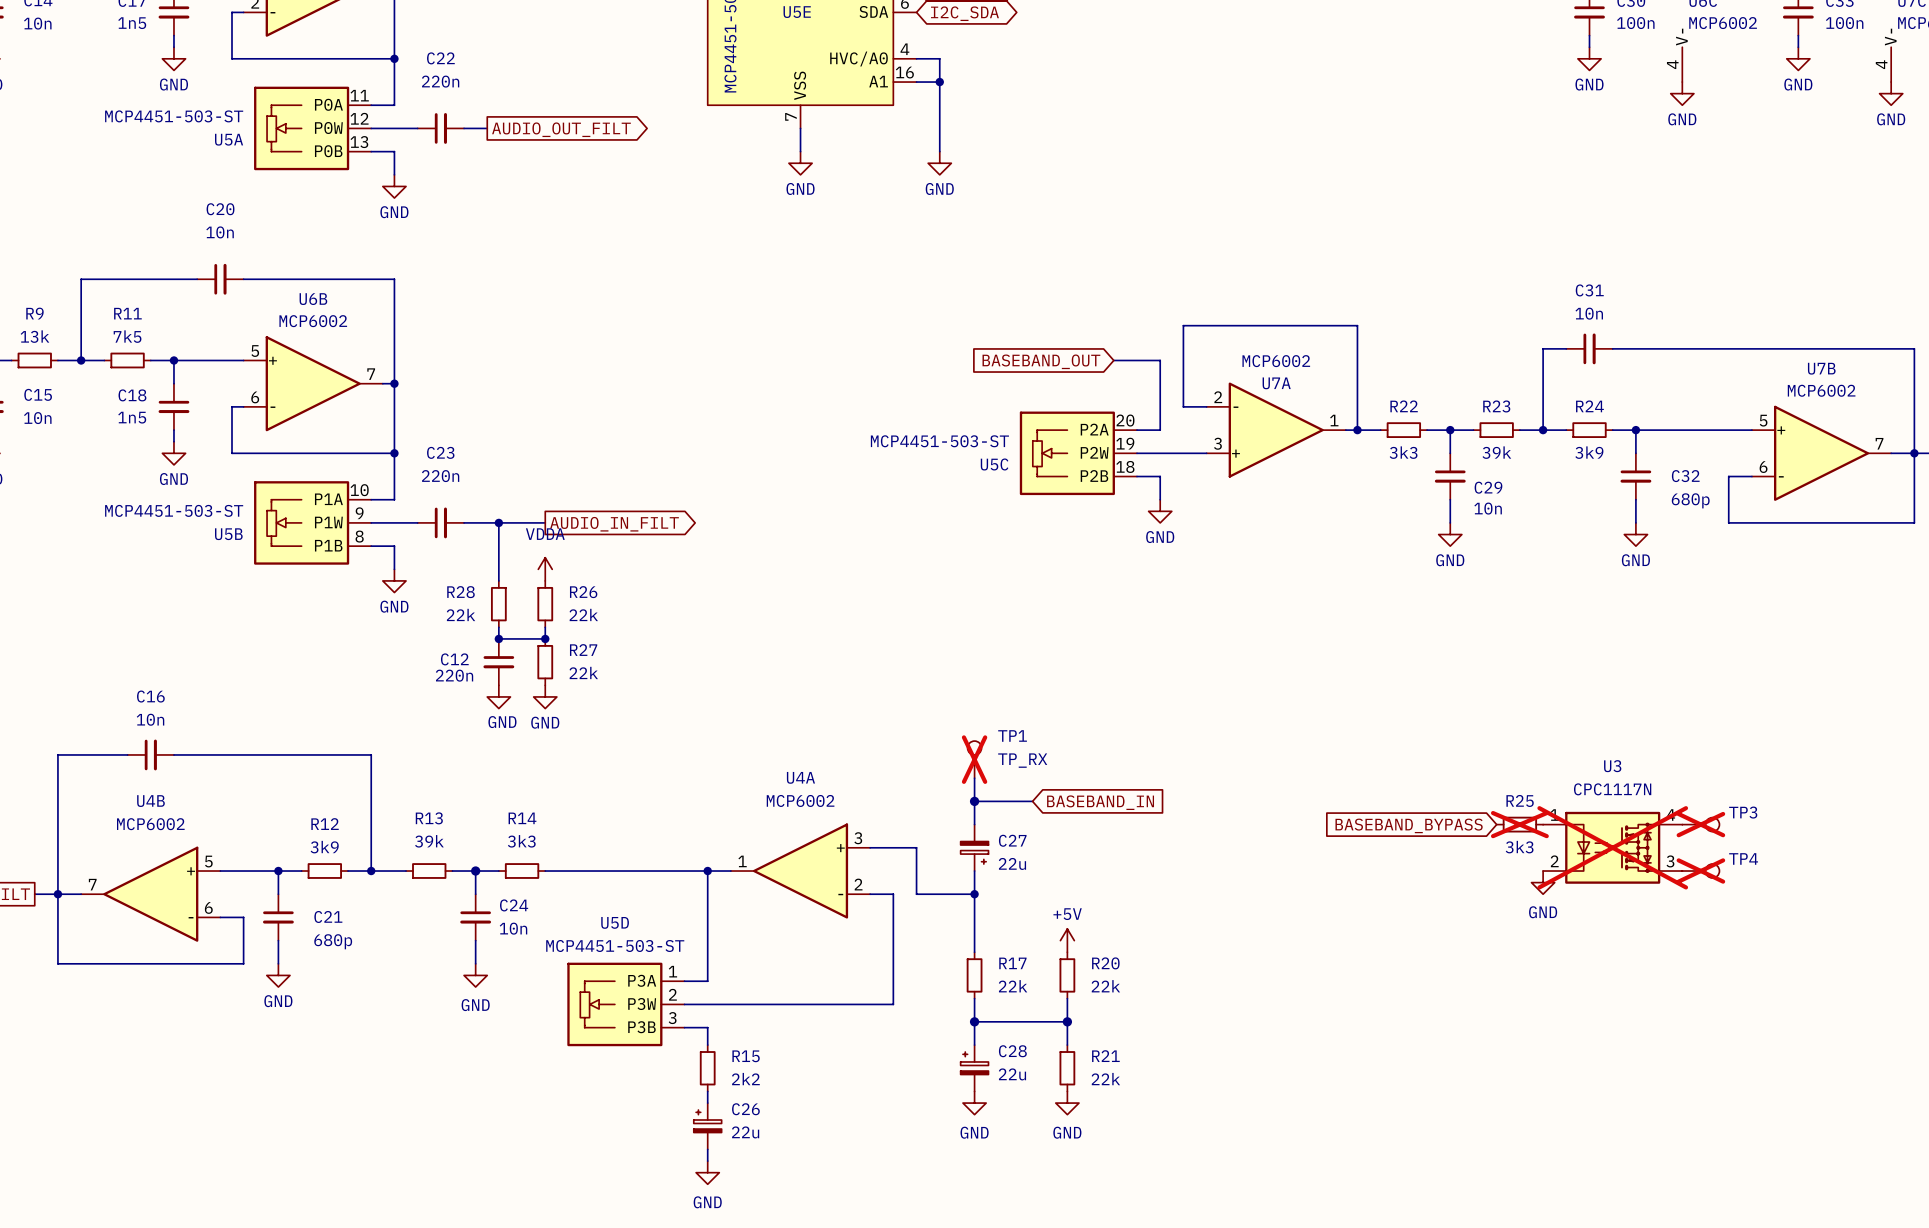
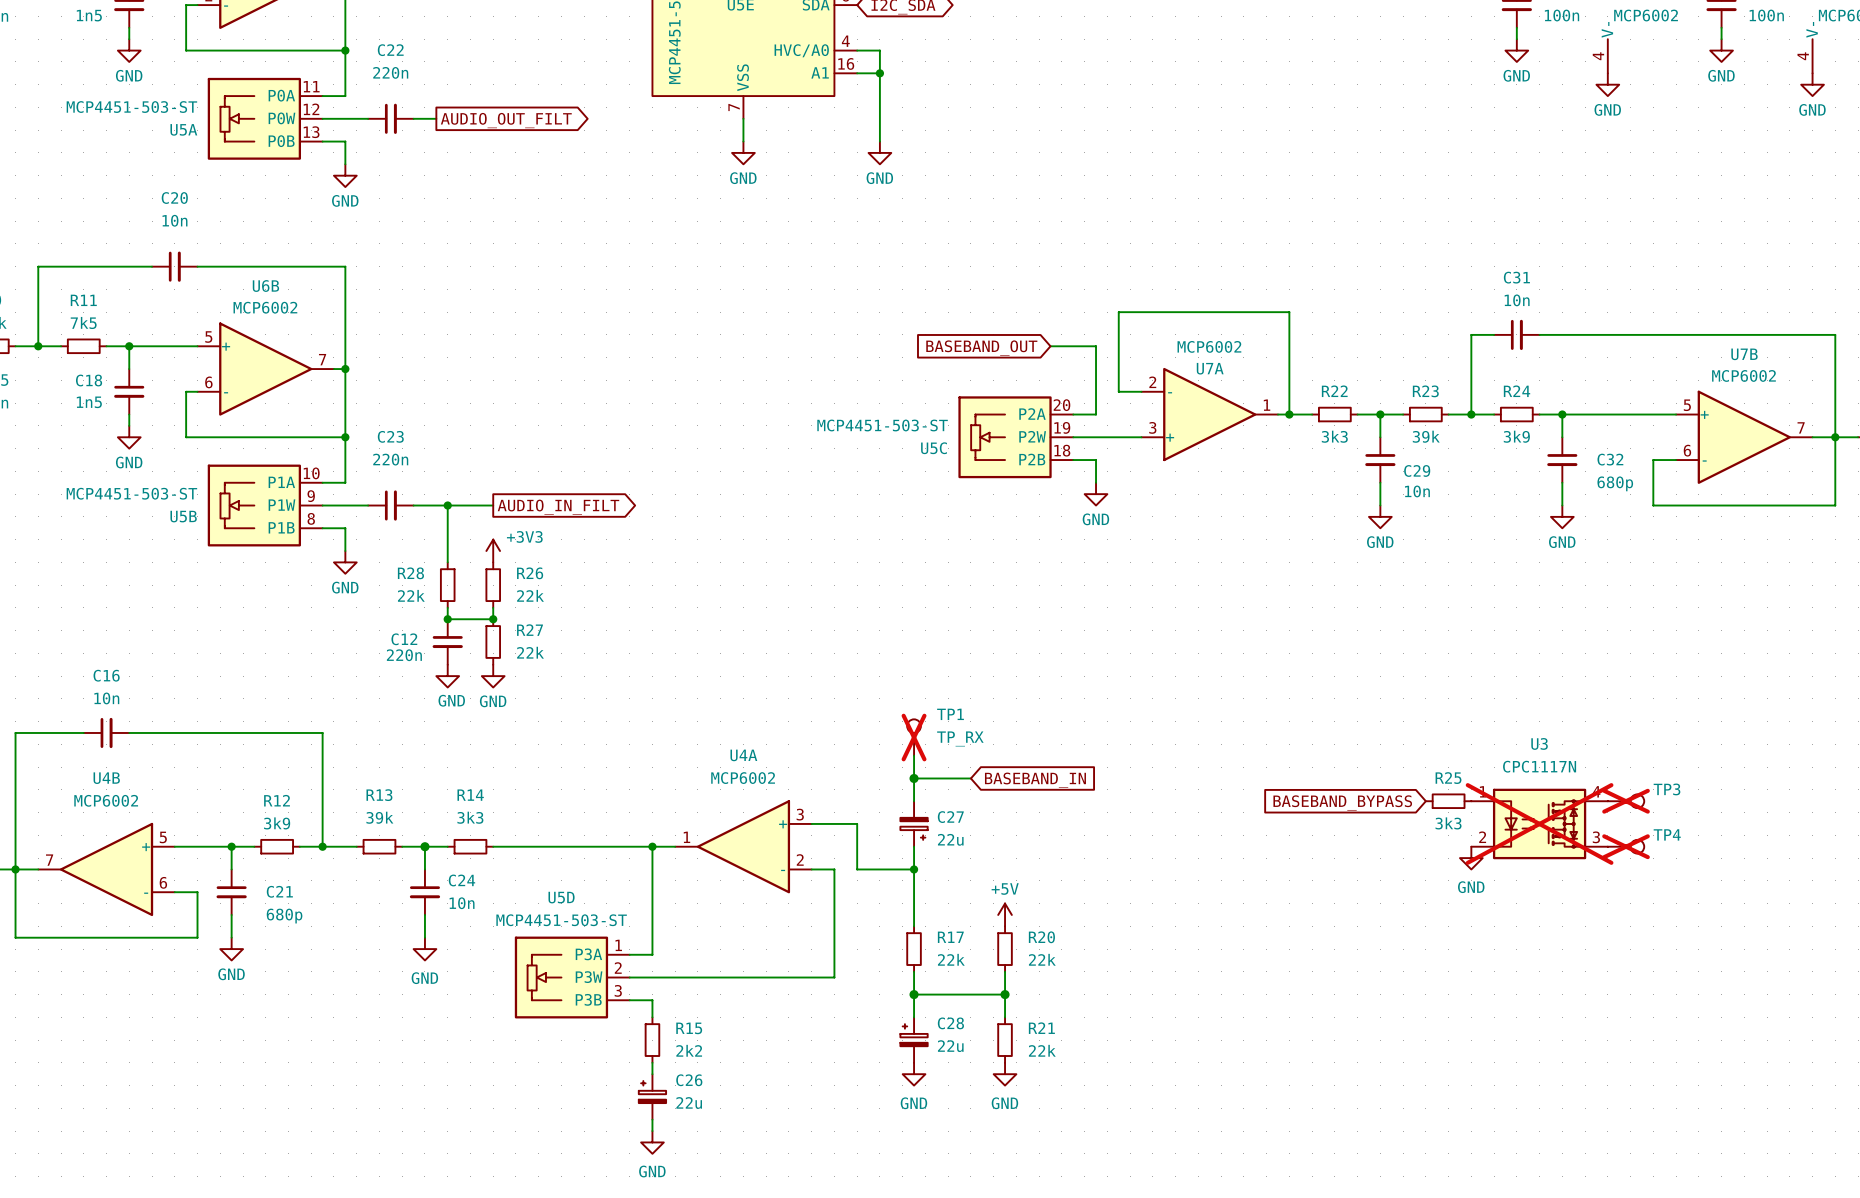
power symbol: VDDA (545, 569) -> +3V3 (493, 551)
R25 do-not-place cross: (1519, 824) -> none

